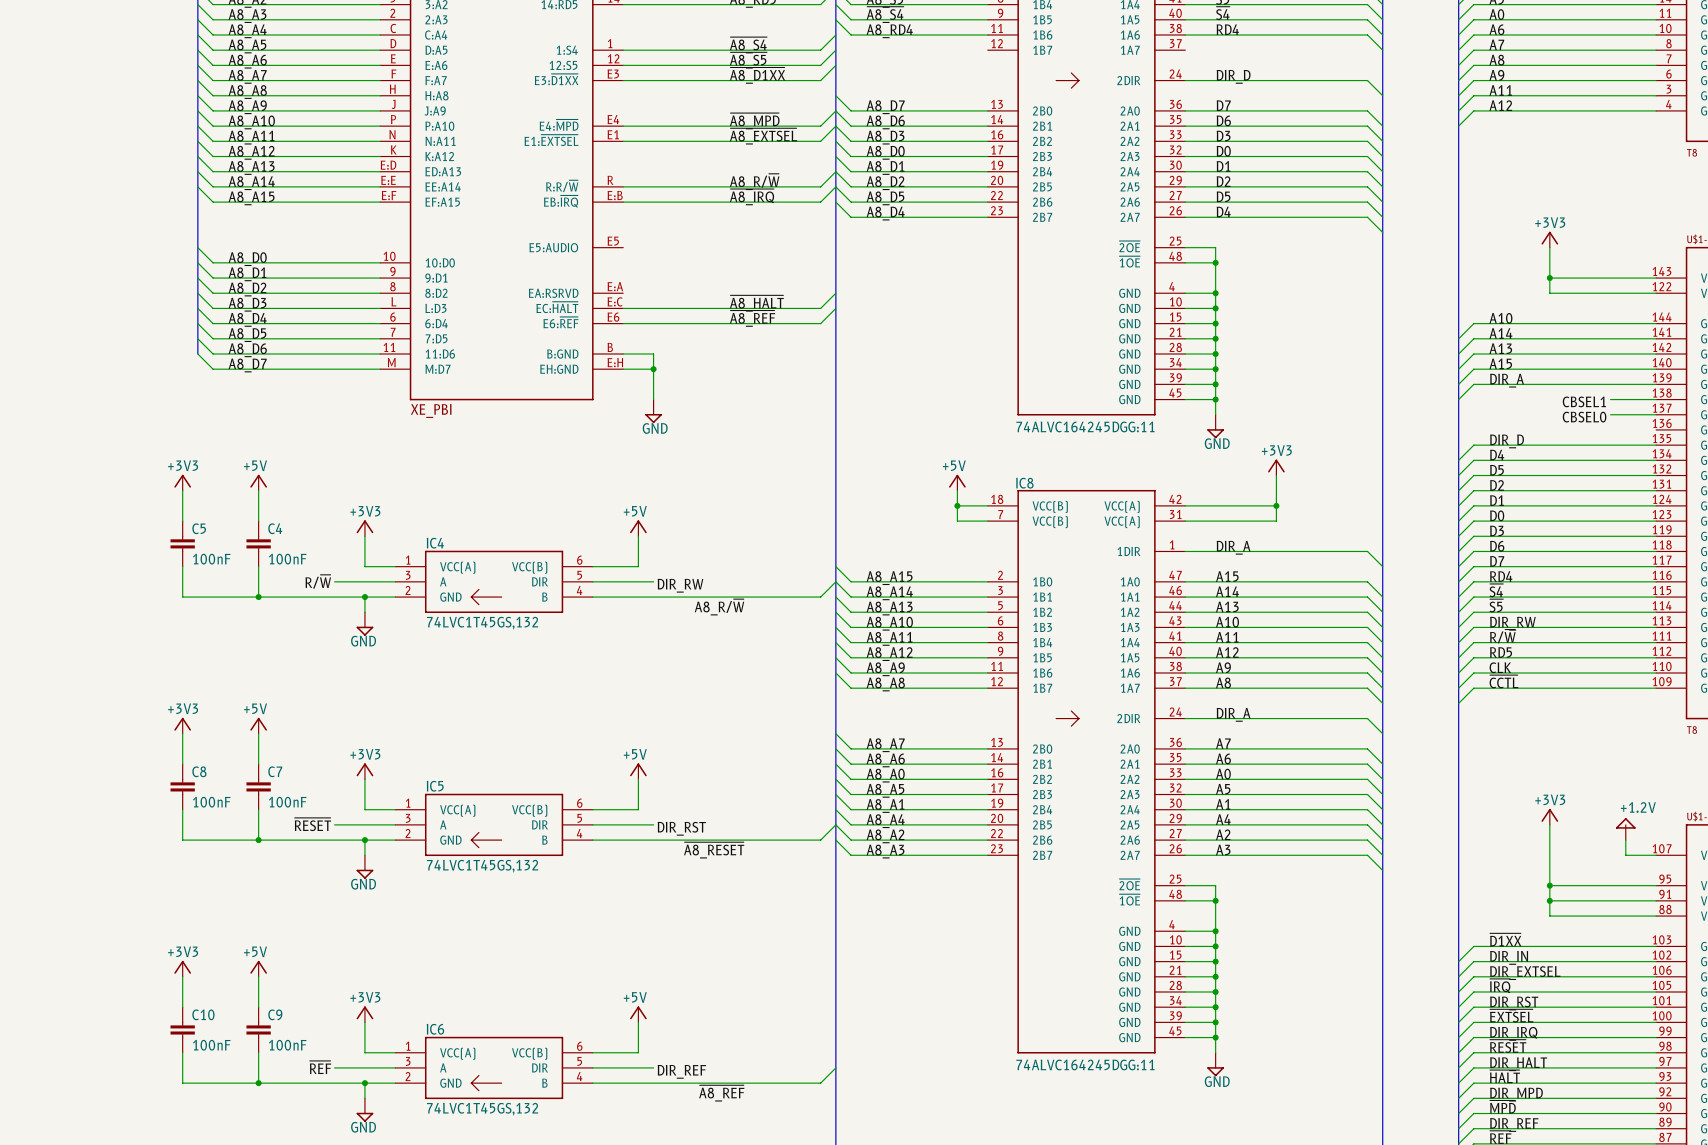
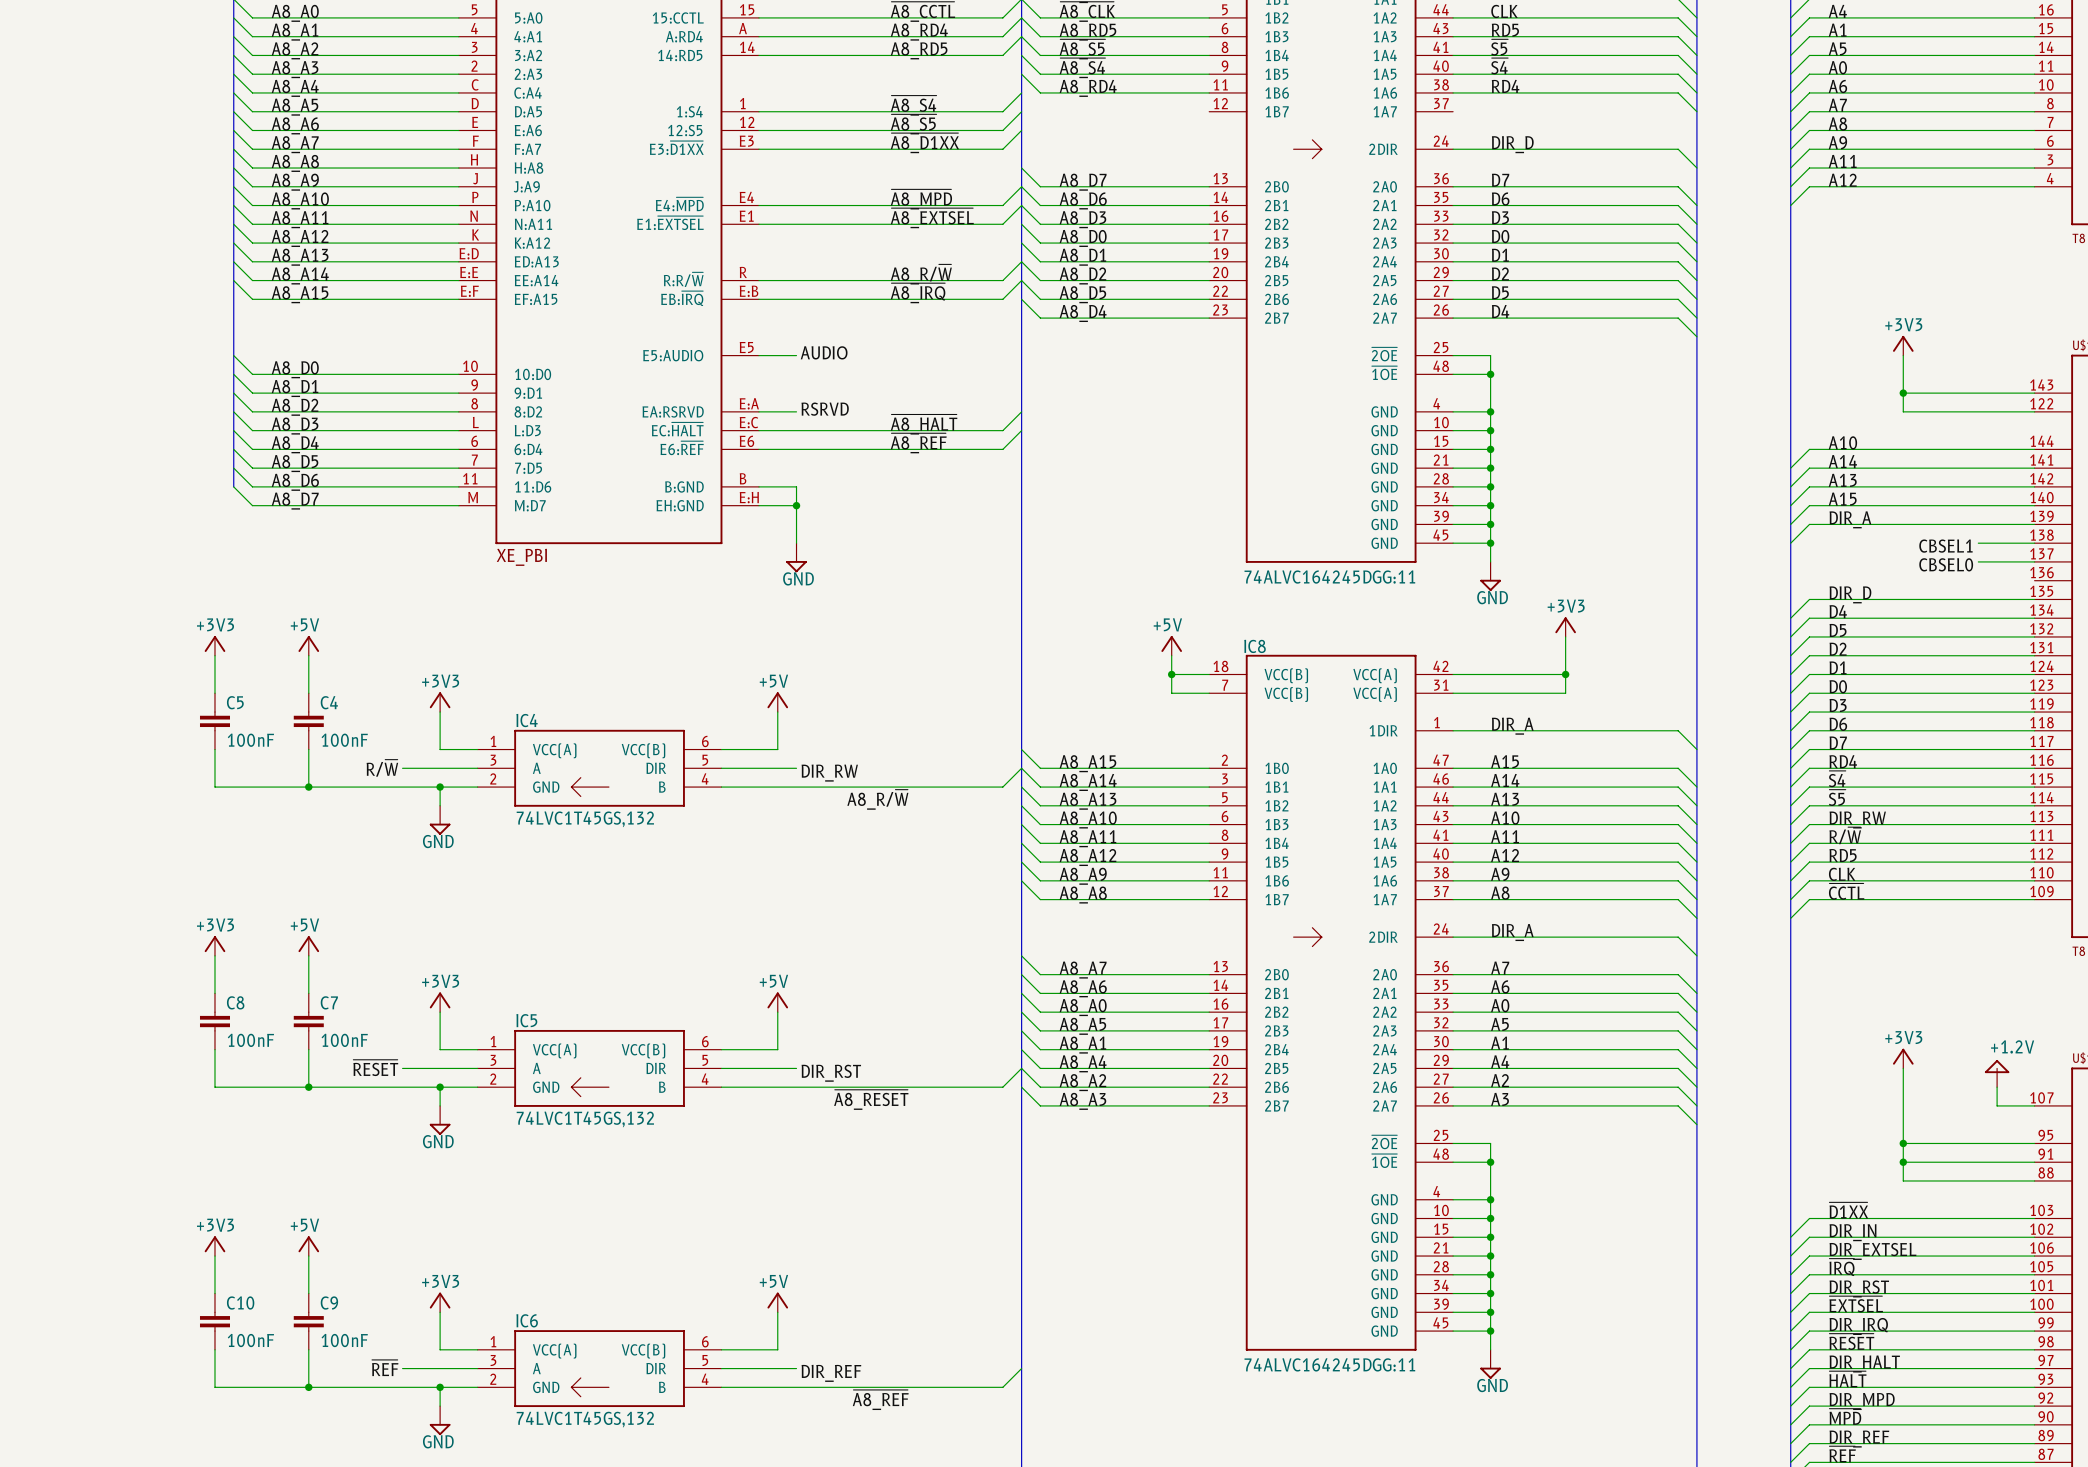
label: none -> AUDIO (824, 352)
wire: none -> (759, 355) (796, 355)
label: none -> RSRVD (825, 409)
wire: none -> (759, 411) (796, 411)

